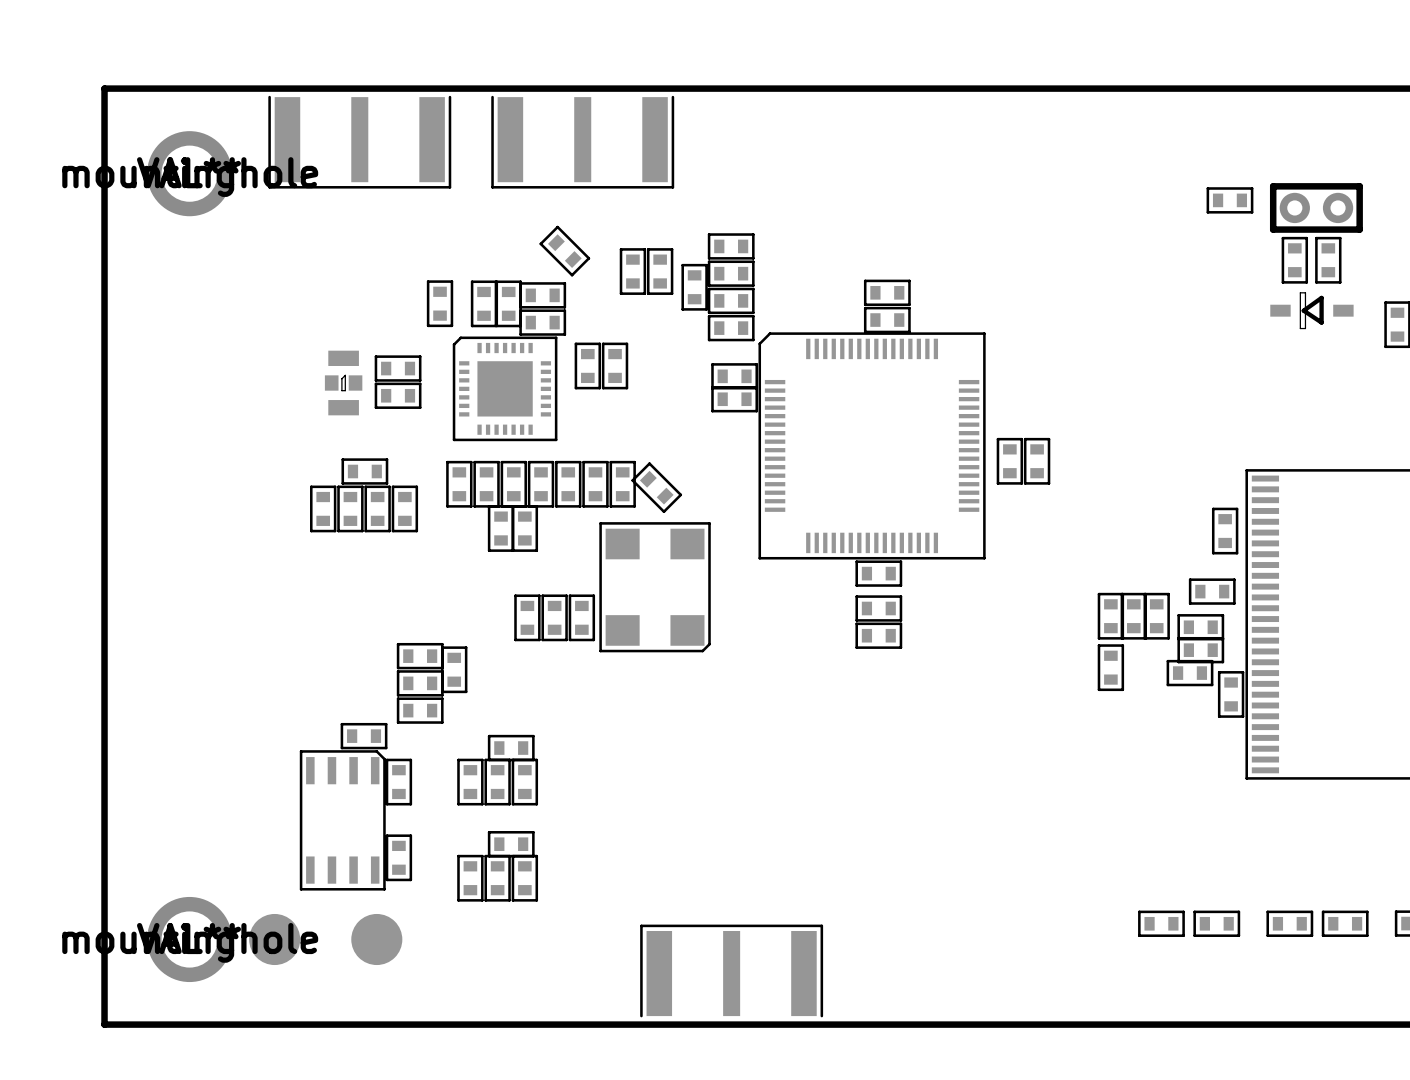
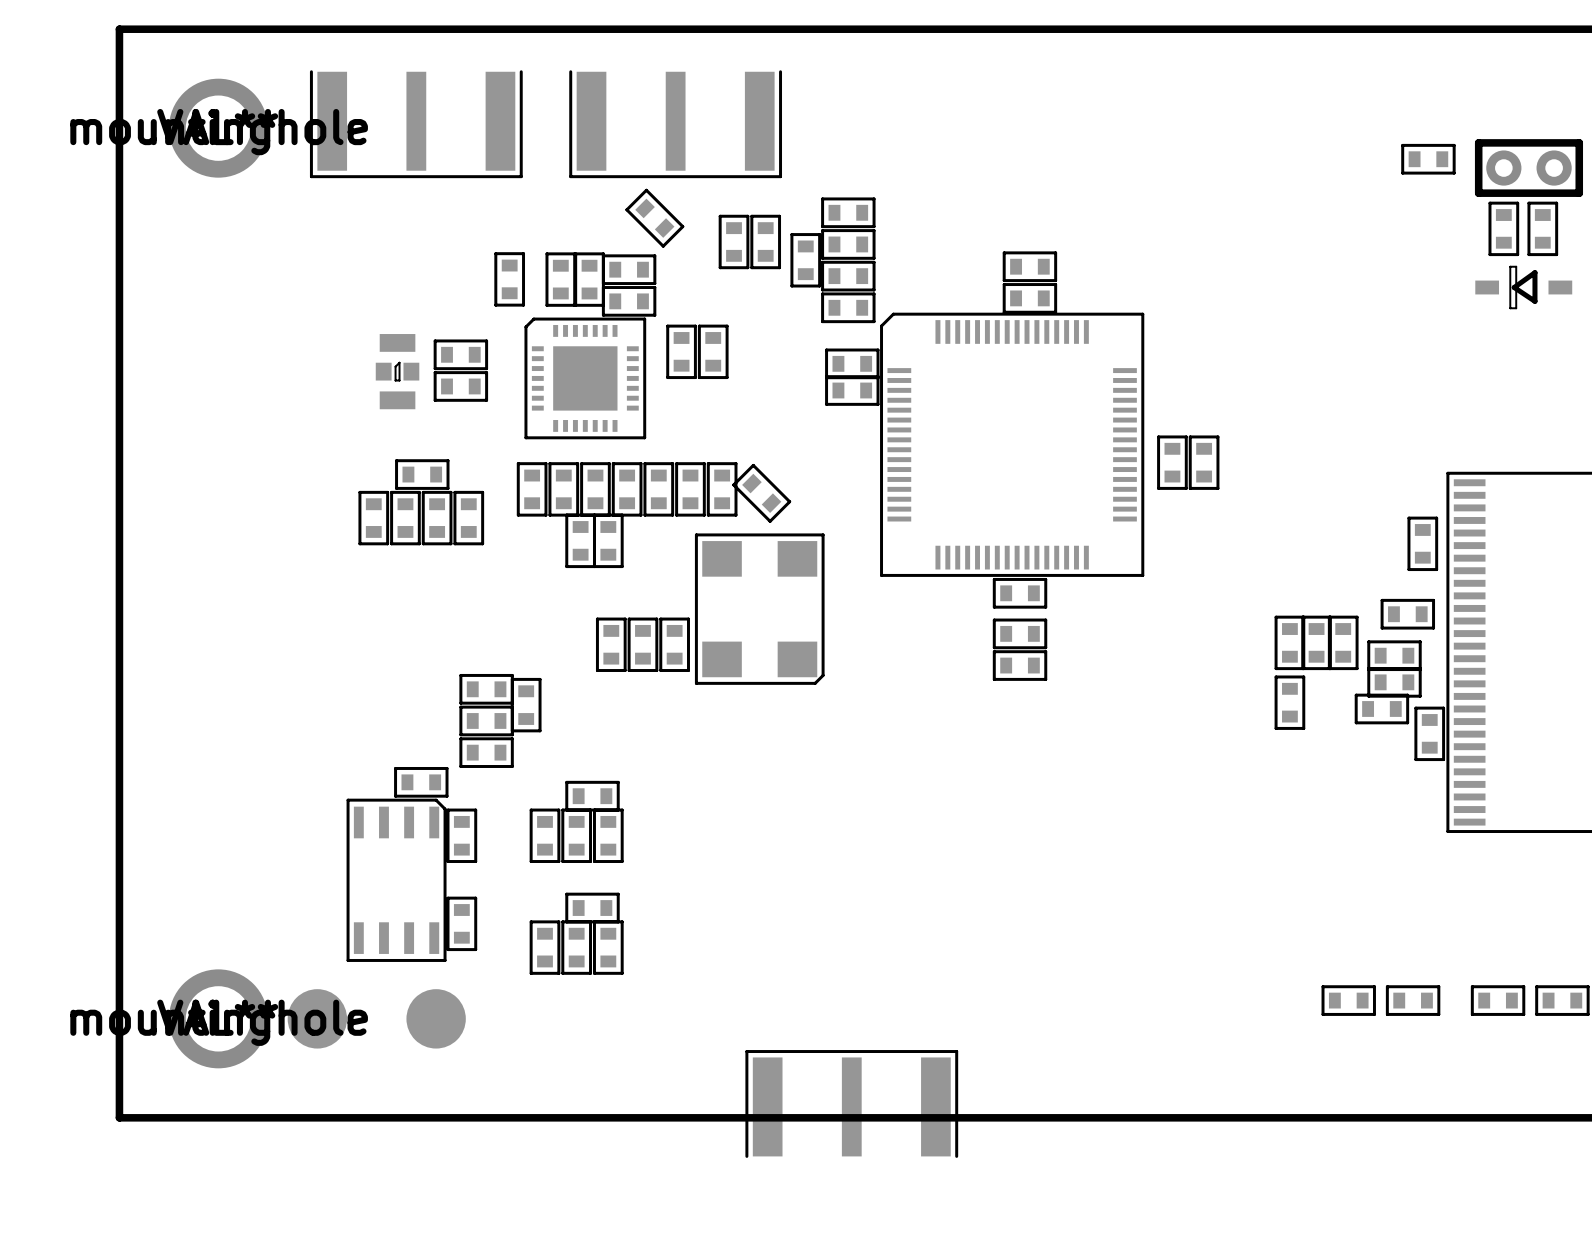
part position: (359, 142) -> (416, 124)
part position: (582, 142) -> (675, 124)
part position: (731, 970) -> (851, 1103)

